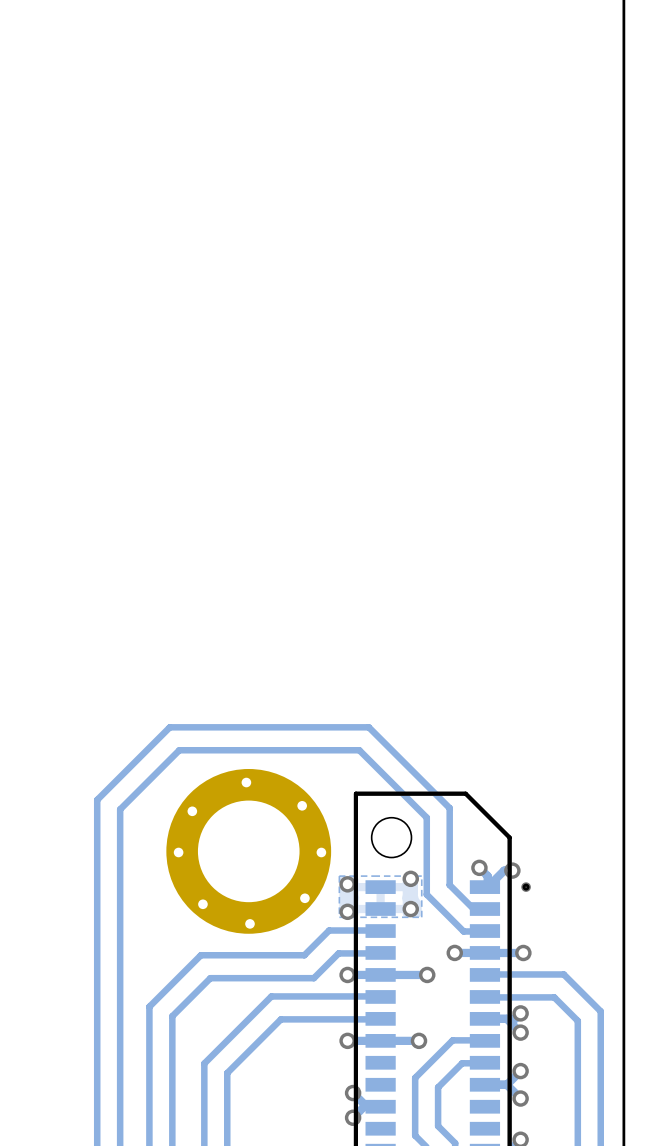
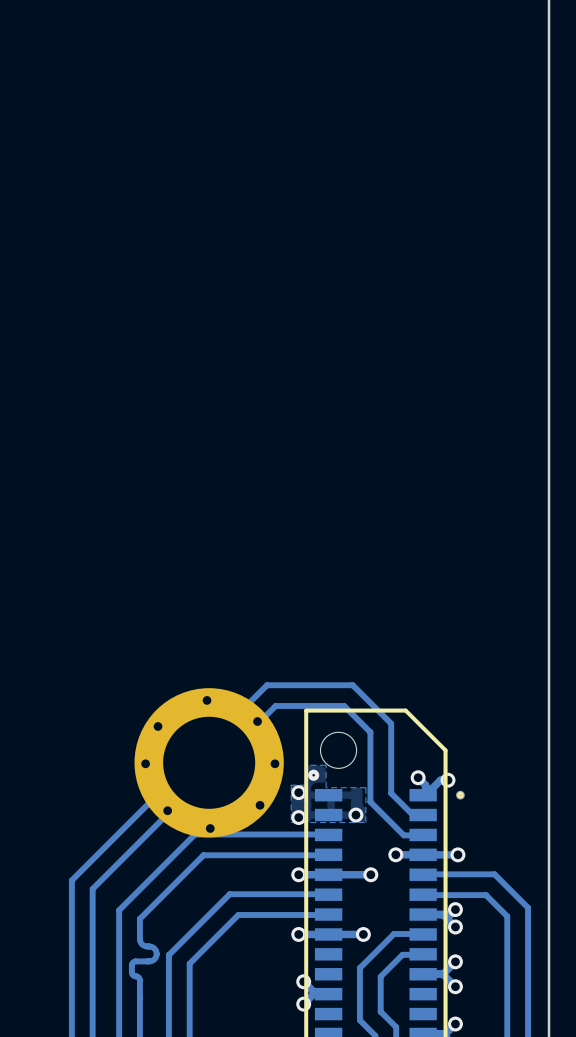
track: (407, 765) (368, 727) (169, 727) (97, 799) (97, 981) -> (352, 685) (267, 685) (71, 880)
track: (397, 788) (359, 750) (179, 750) (120, 809) (120, 990) -> (344, 706) (275, 706) (92, 889)
via: none -> (313, 775)
zone outline: (355, 876) (421, 876) (421, 878) -> (306, 785) (306, 765) (326, 765) (326, 787) (365, 787)
via: (410, 878) -> none
track: (329, 930) (304, 955) (200, 955) (149, 1006) (149, 1014) -> (282, 834) (194, 834) (119, 910)
track: (338, 953) (313, 978) (210, 978) (172, 1016) (172, 1023) -> (290, 855) (203, 855) (139, 918)
track: (172, 1045) (172, 1091) -> (139, 939) (142, 944) (152, 947) (156, 953) (152, 960) (132, 963) (132, 974) (139, 980)

